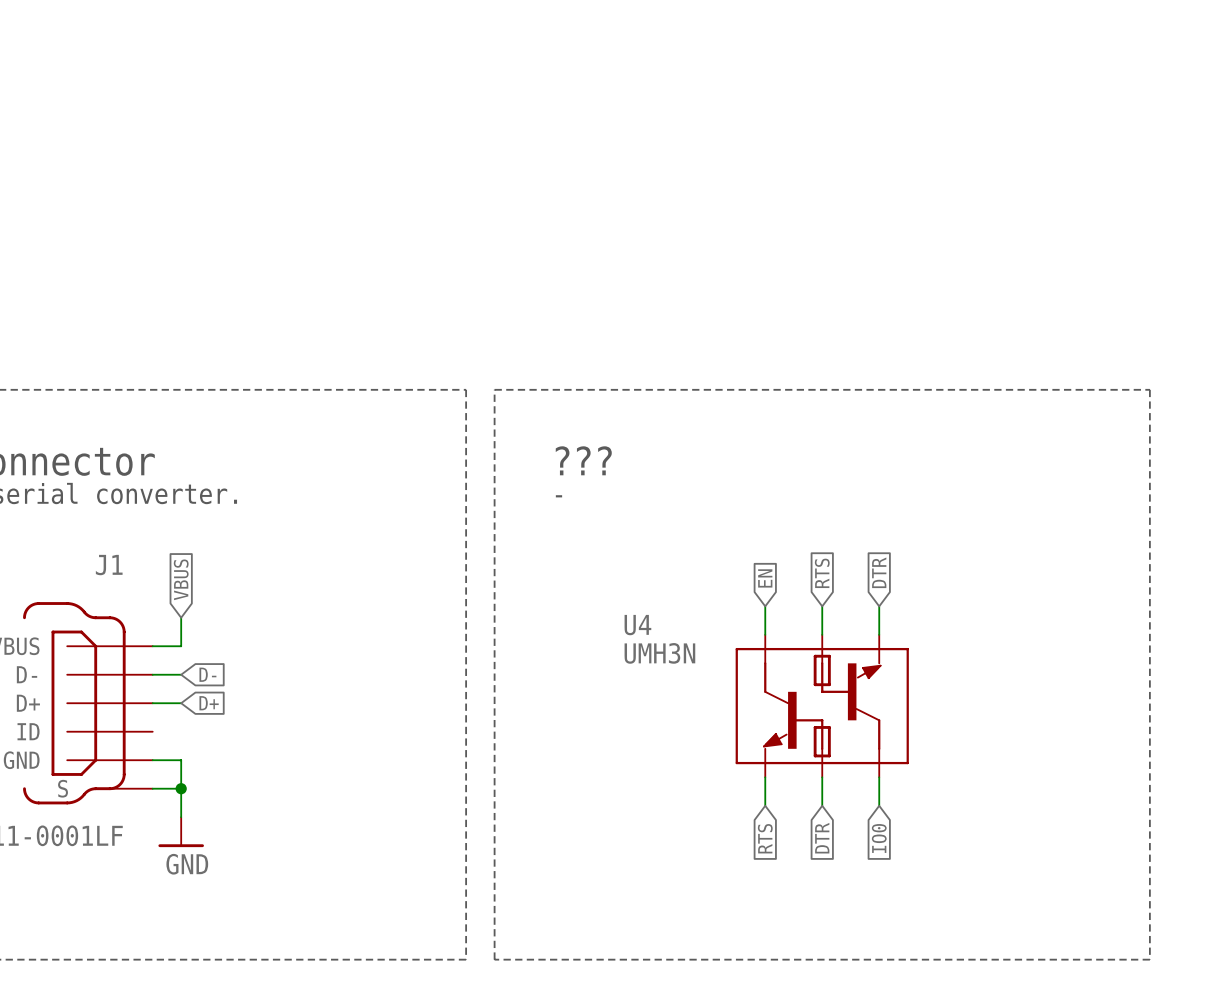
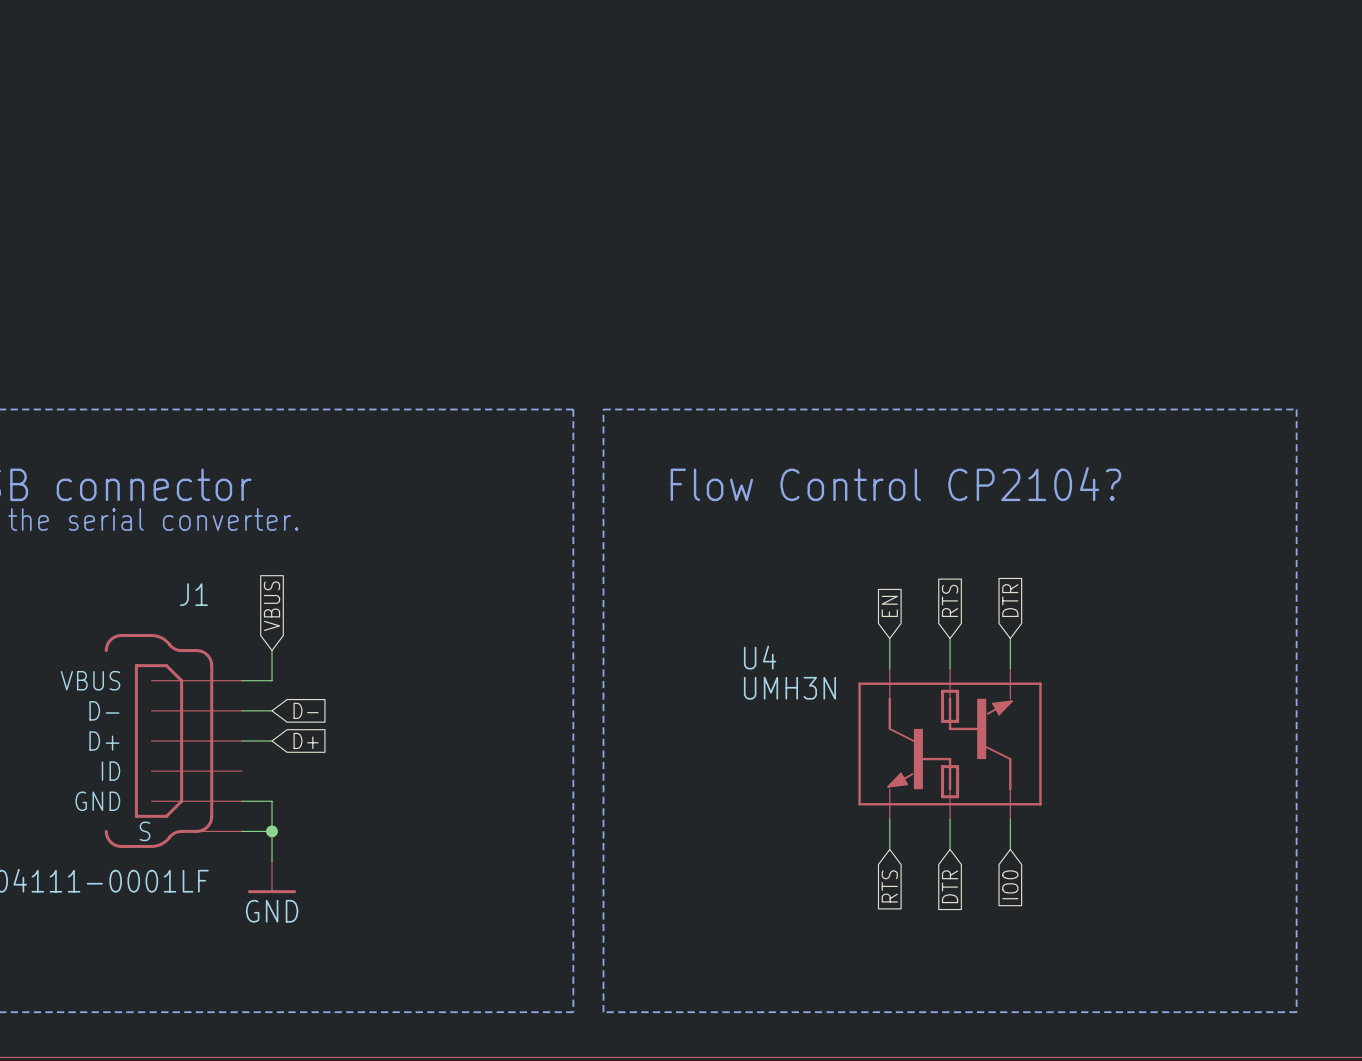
text: ??? (583, 460) -> Flow Control CP2104? (895, 484)
text: - (558, 496) -> none

